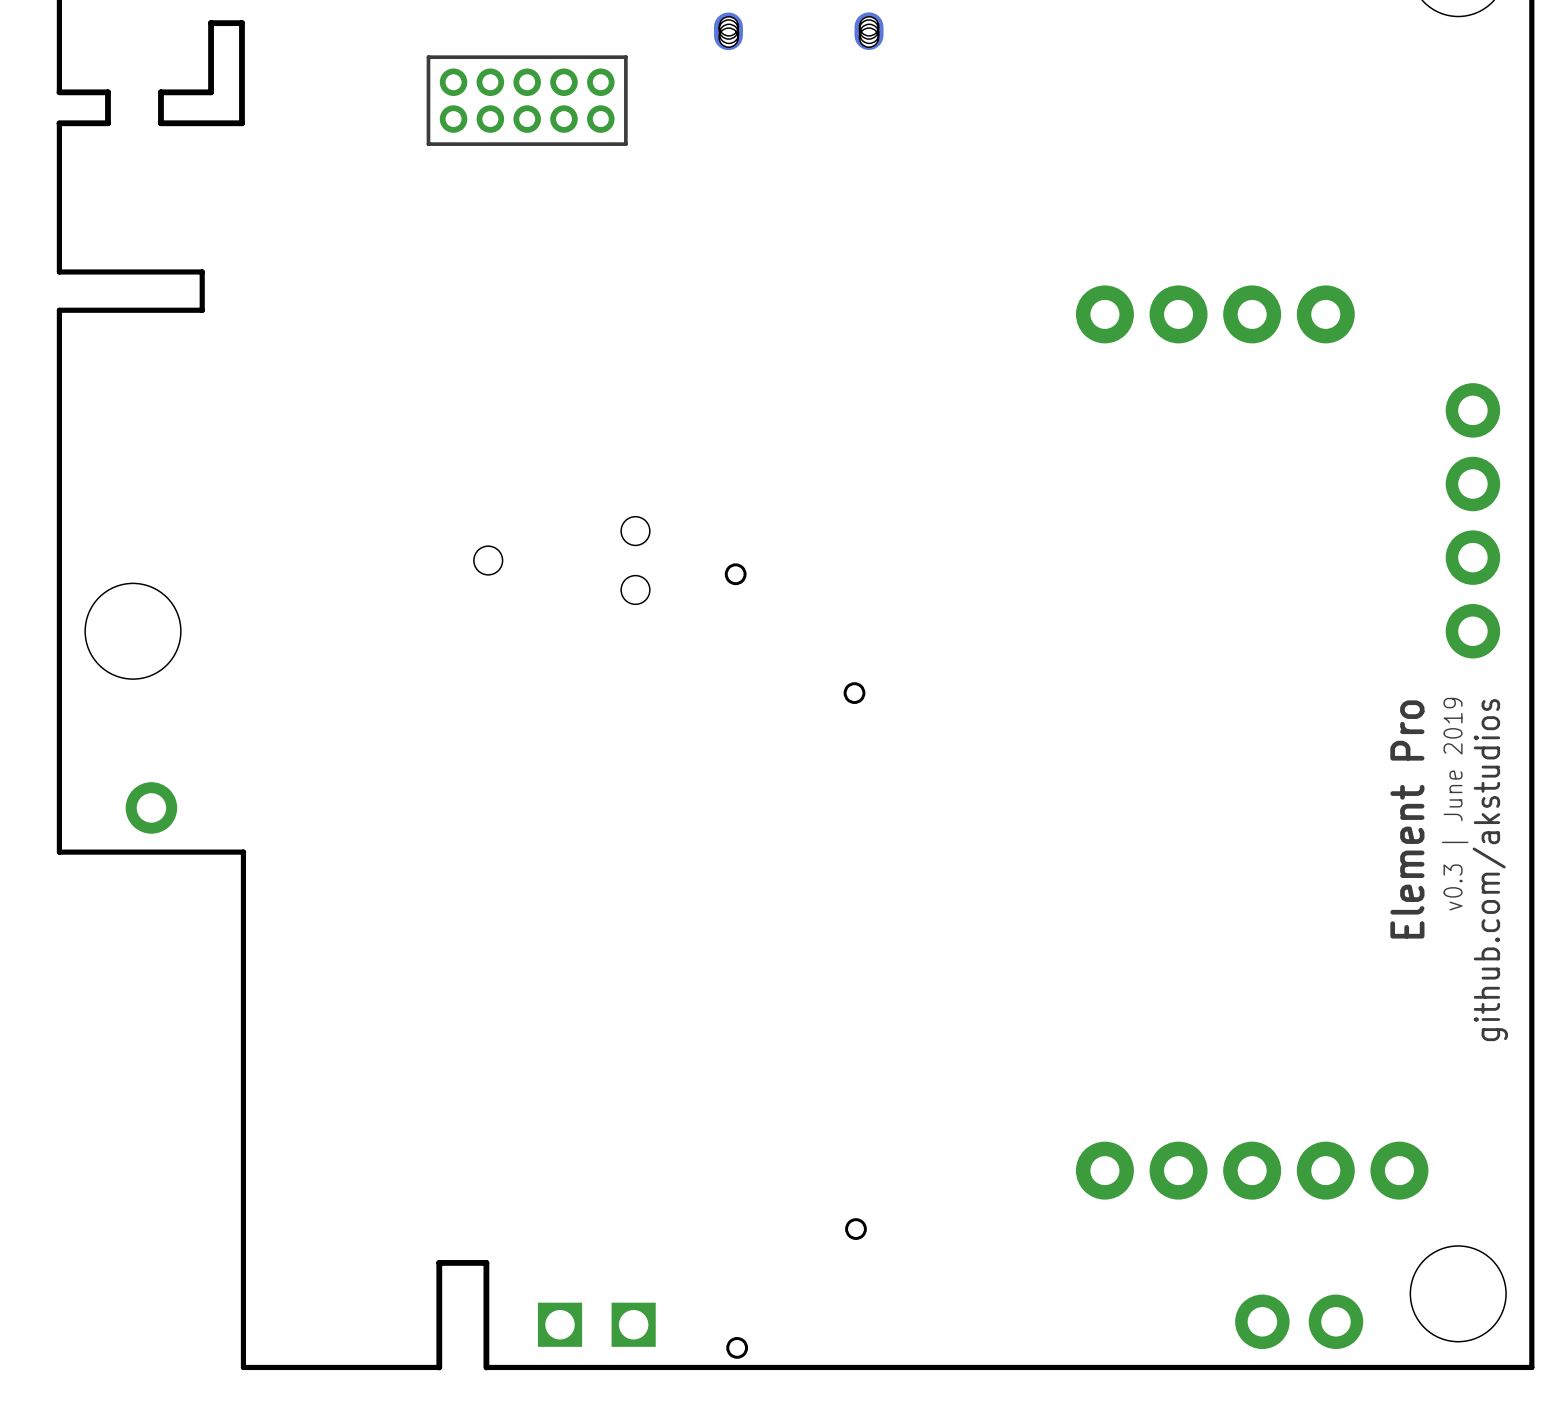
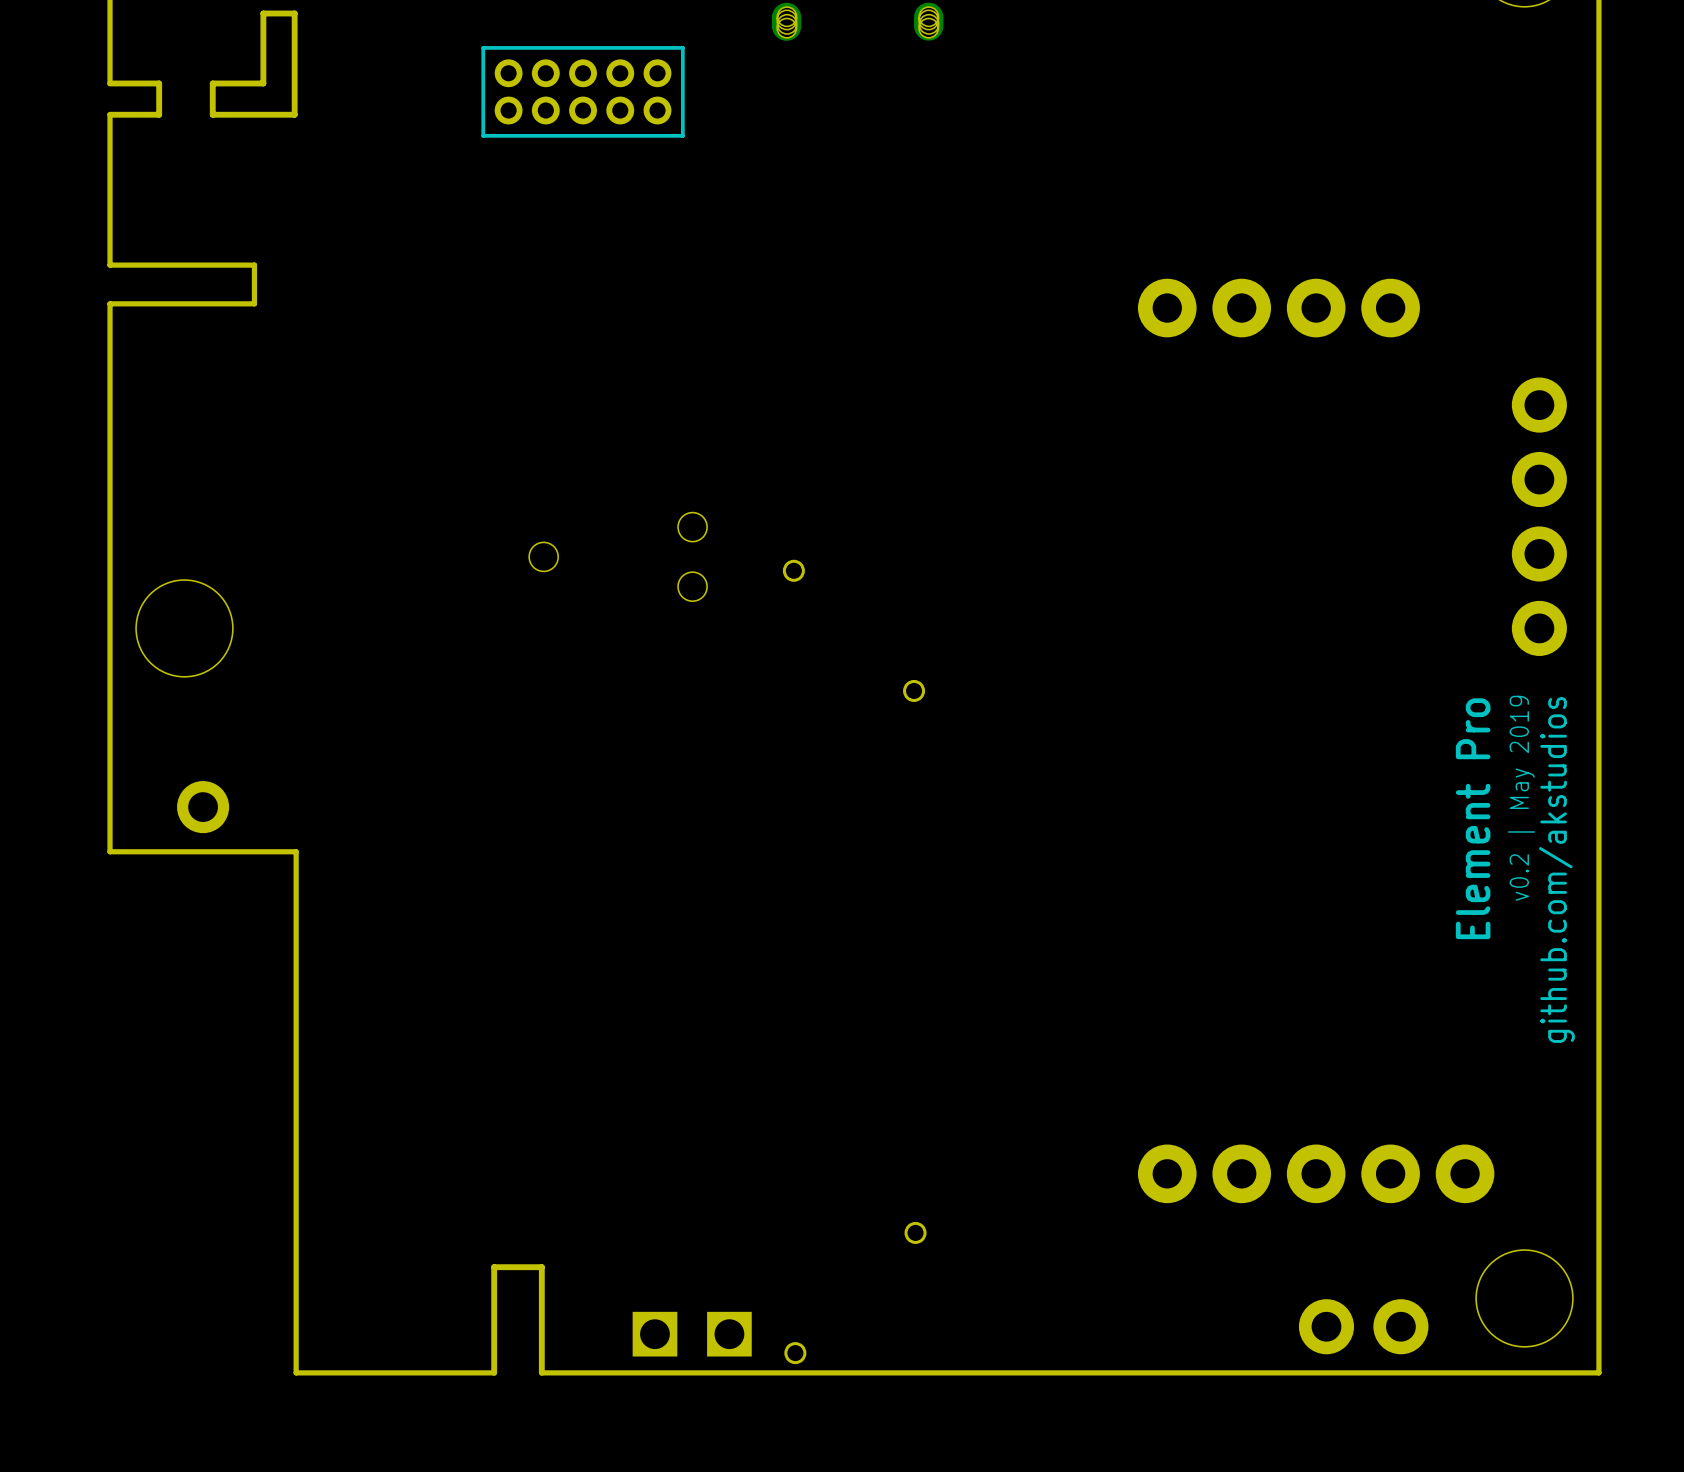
text: v0.3 | June 2019 (1455, 804) -> v0.2 | May 2019 (1521, 798)
part position: (596, 1324) -> (692, 1334)

